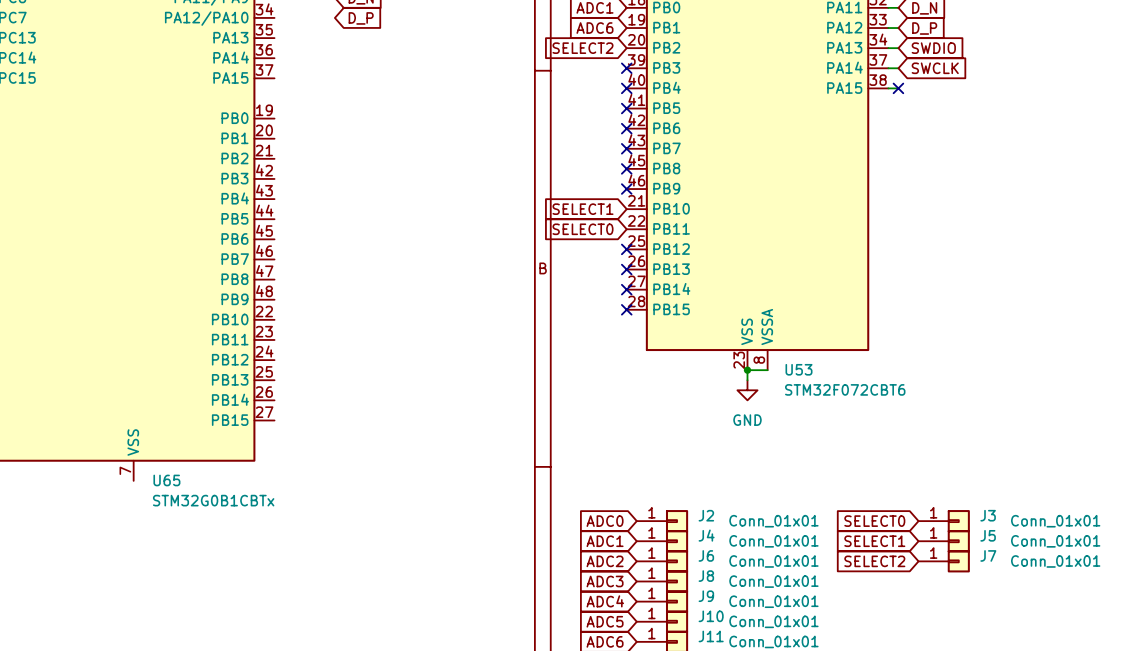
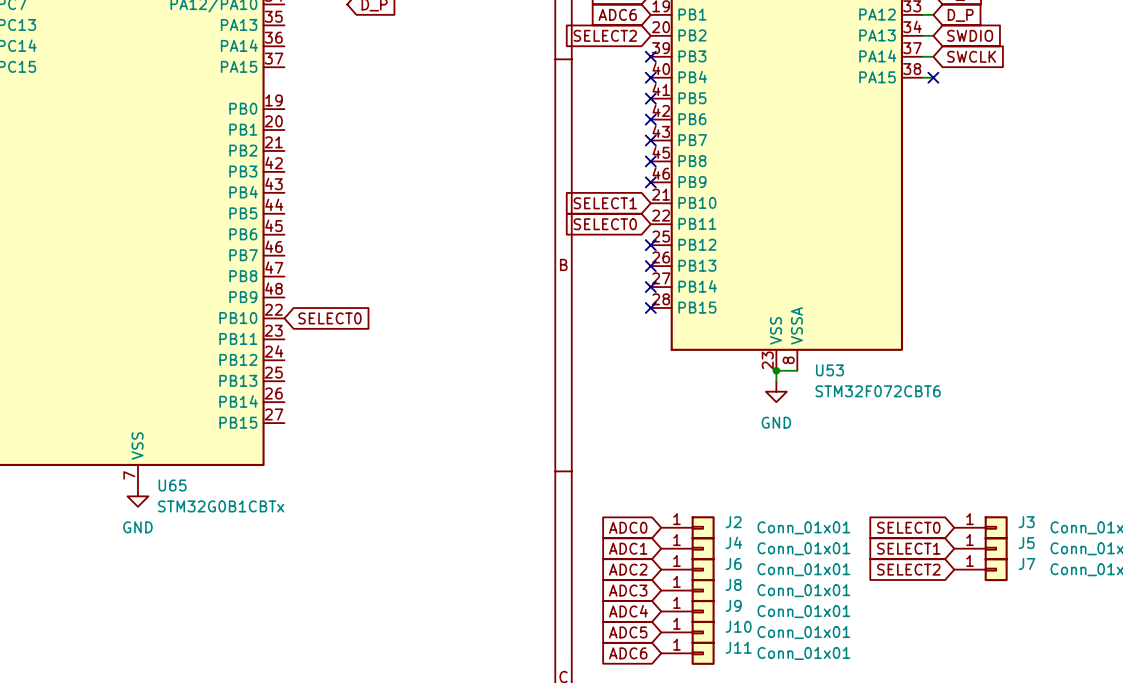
global label: none -> SELECT0 (329, 318)
power symbol: none -> GND (137, 496)

